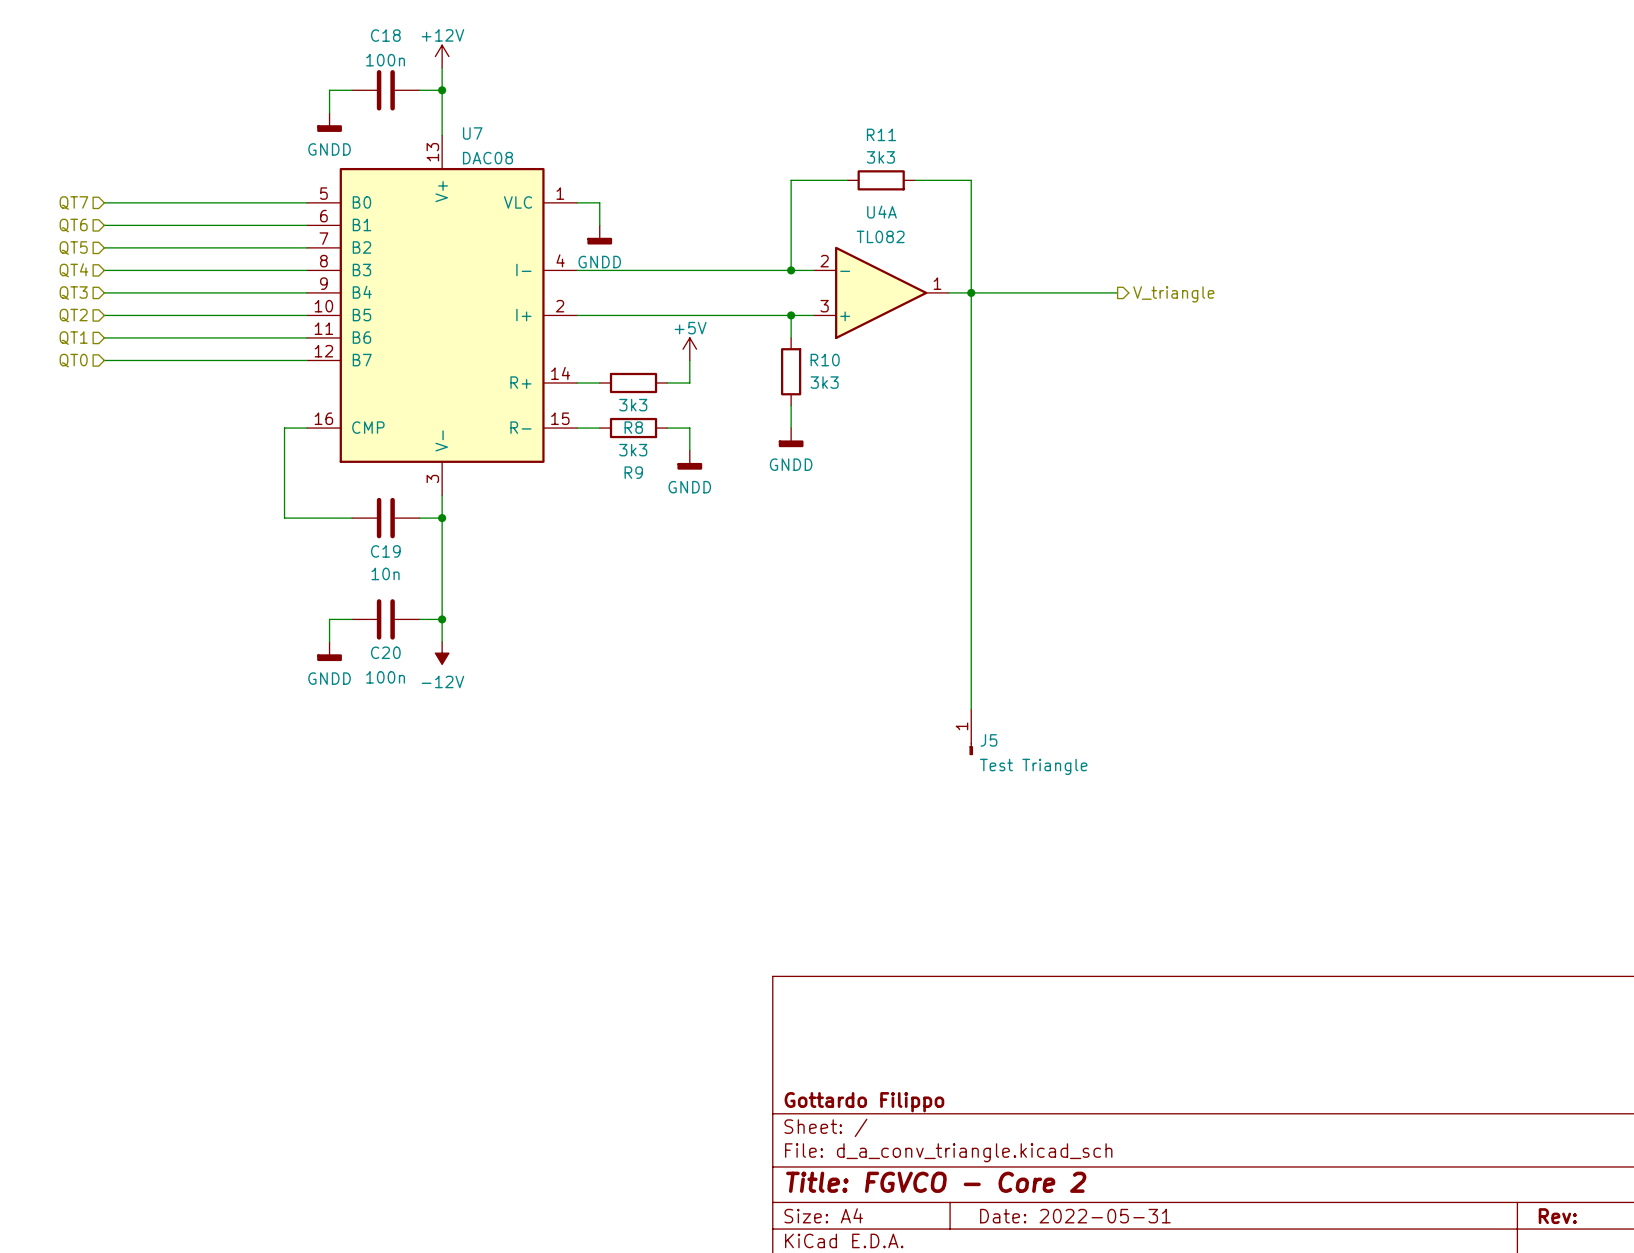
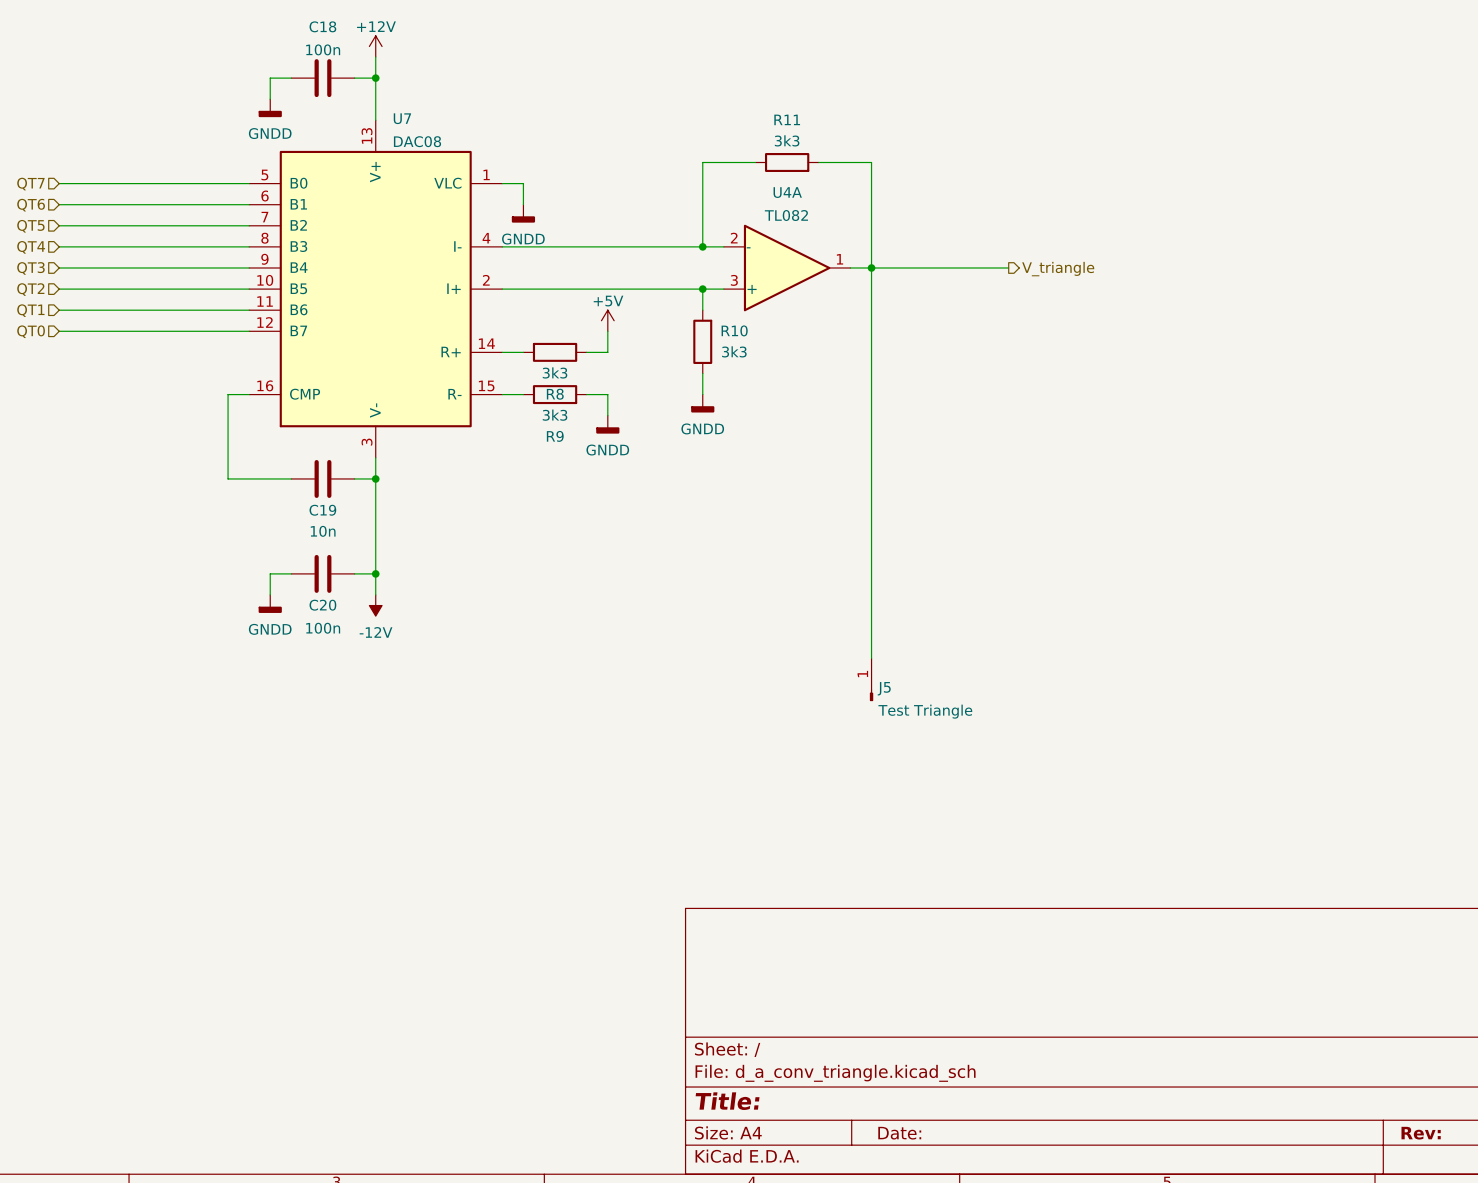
title block: Gottardo Filippo (864, 1102) -> none
title block: Title: FGVCO - Core 2 (936, 1182) -> Title: (727, 1101)
title block: Date: 2022-05-31 (1075, 1216) -> Date: (899, 1133)

